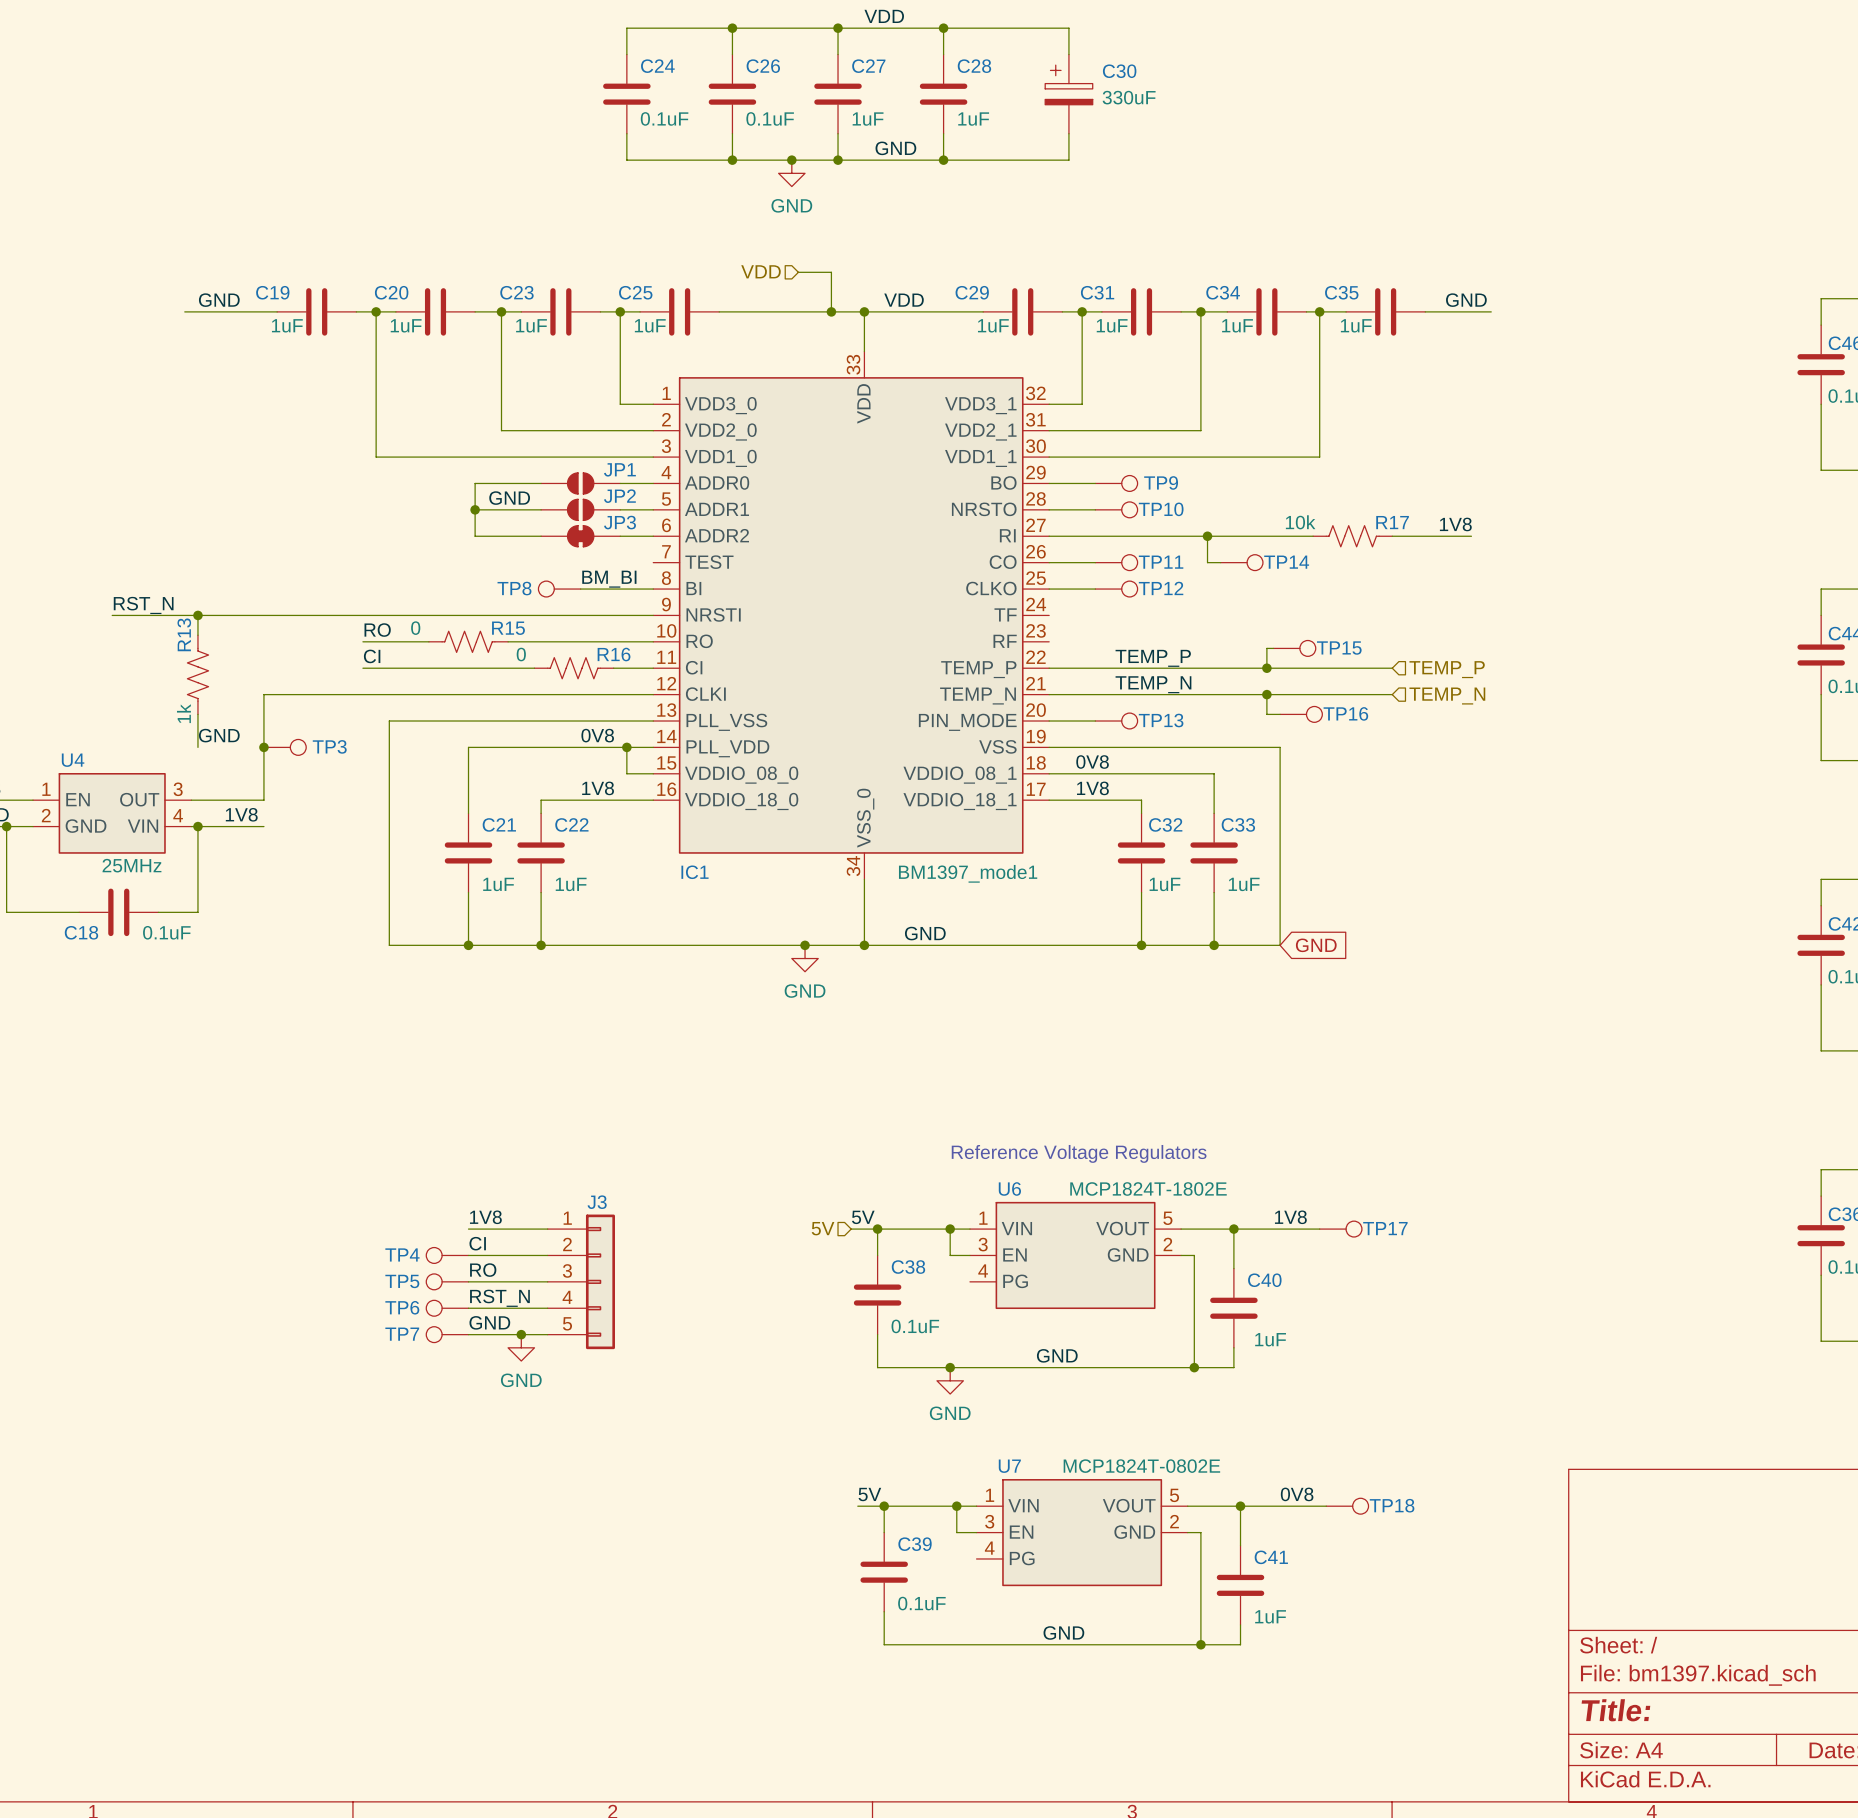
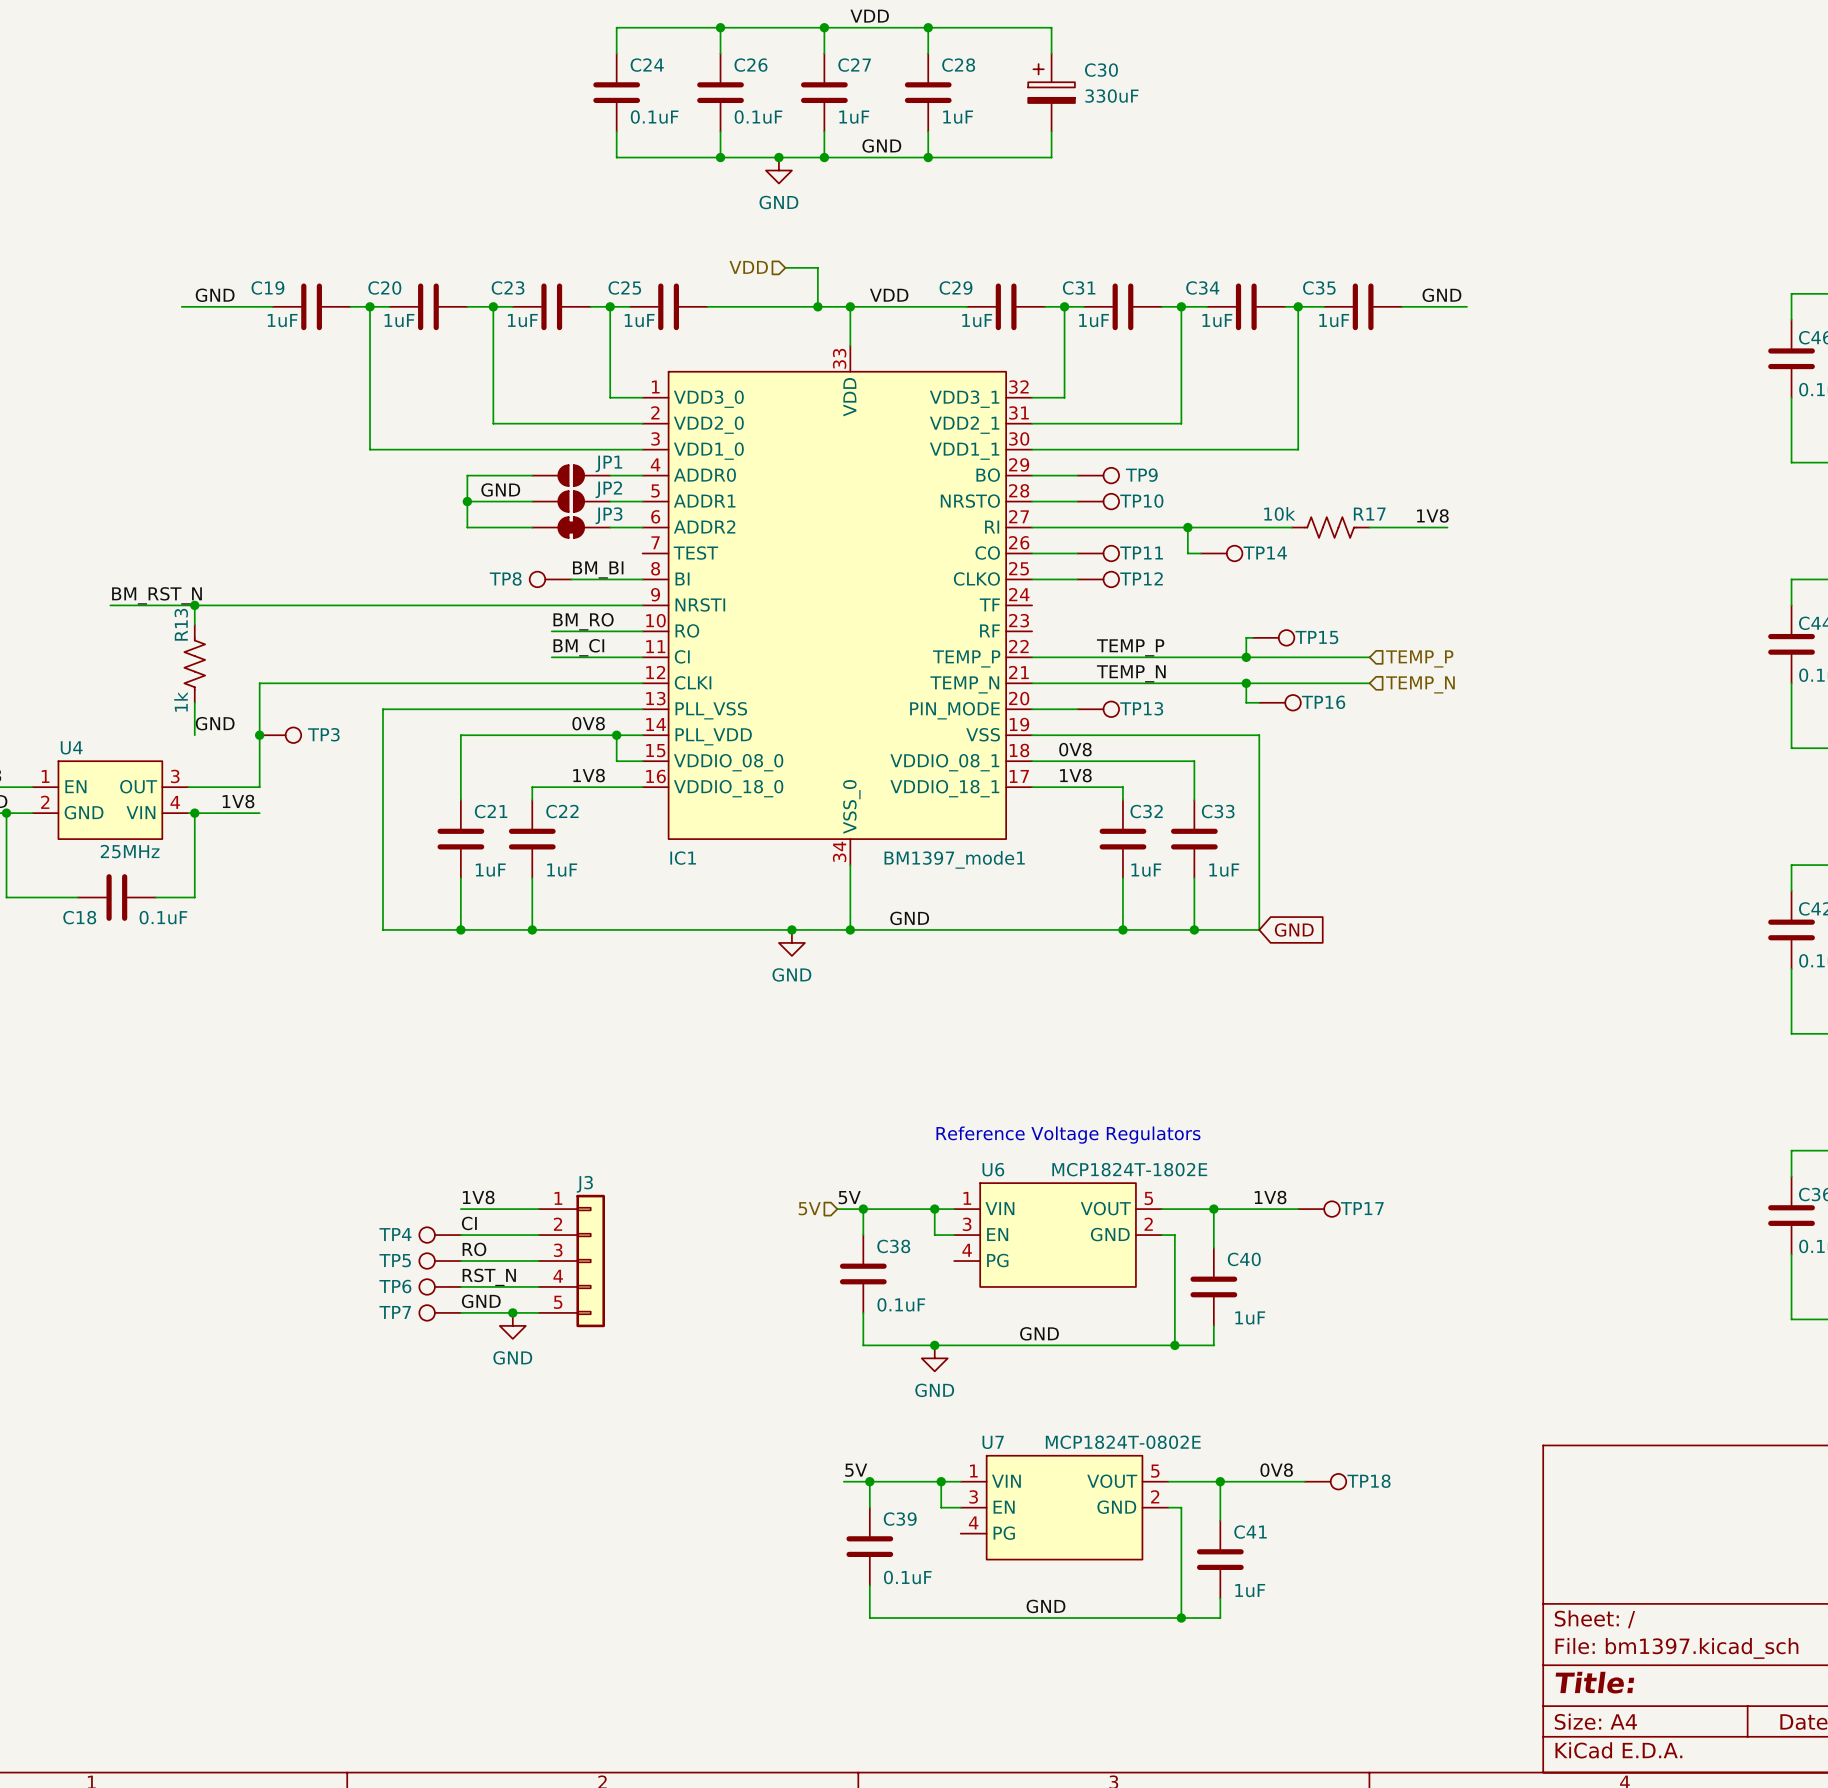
label: RST_N (143, 605) -> BM_RST_N (157, 595)
label: RO (377, 630) -> none
label: none -> BM_RO (583, 621)
wire: (362, 641) (428, 641) -> none
R15: 0 (468, 641) -> none
wire: (508, 641) (560, 641) -> (551, 657) (603, 657)
label: CI (372, 656) -> none
label: none -> BM_CI (578, 647)
wire: (362, 668) (534, 668) -> none
R16: 0 (574, 668) -> none

